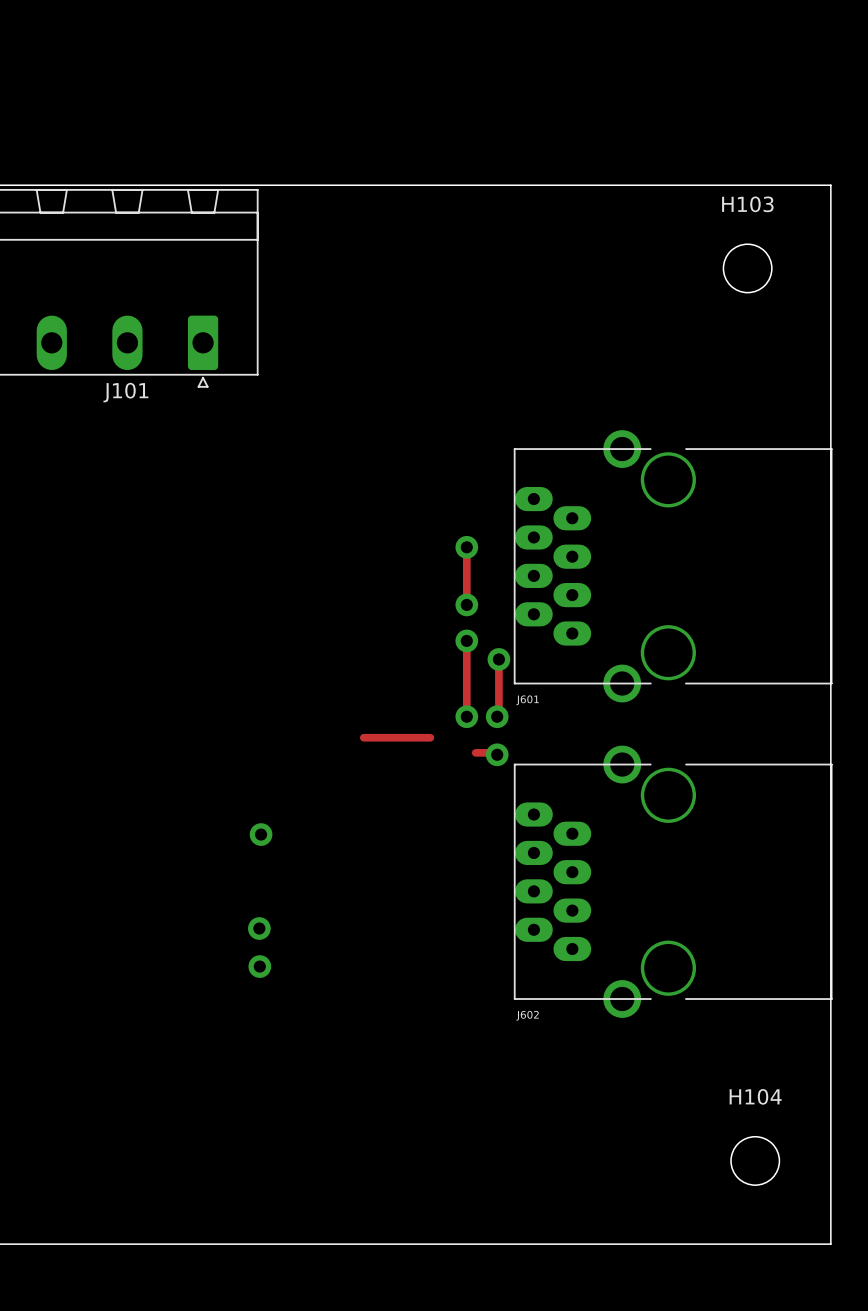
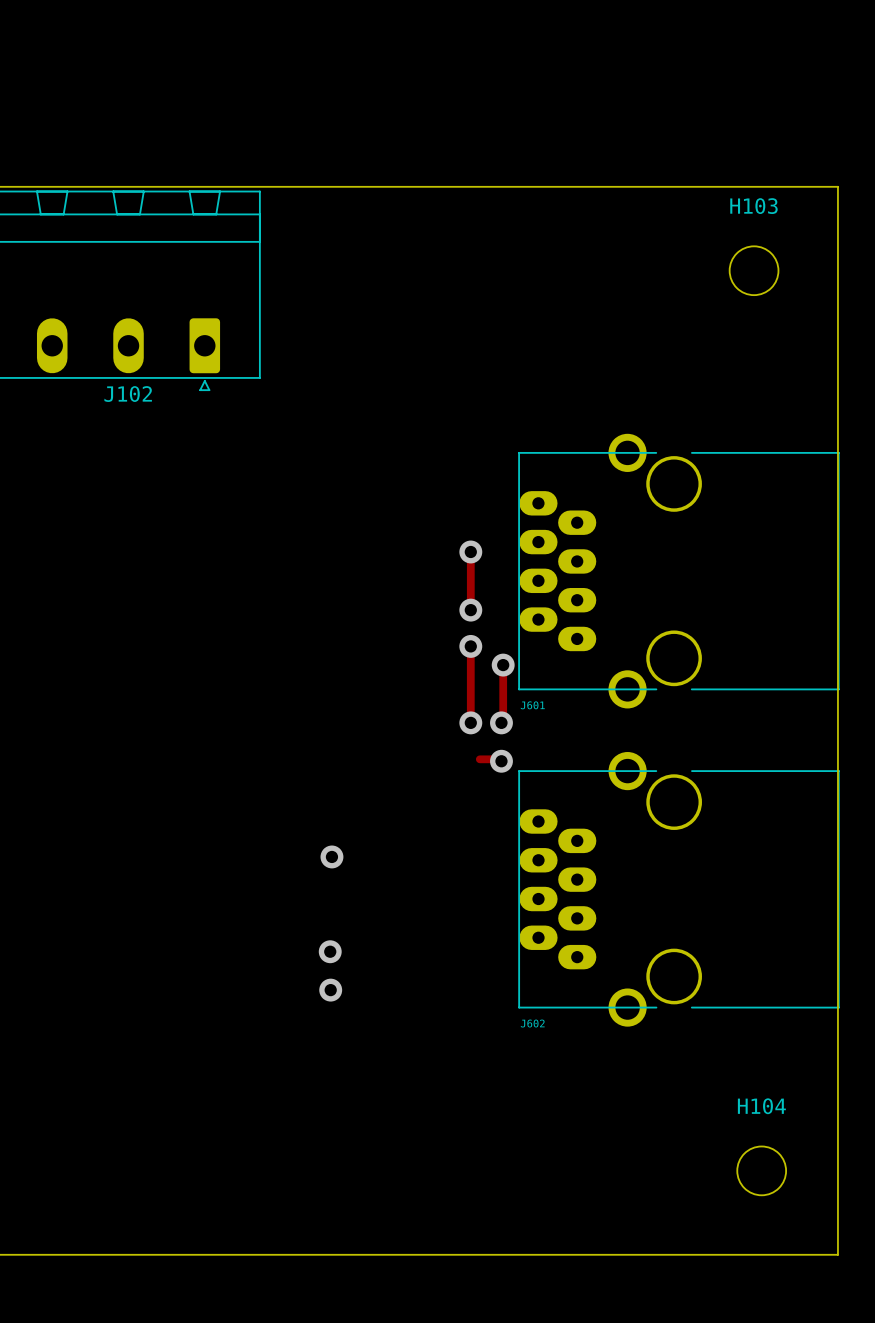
J101 name: J101 (125, 392) -> J102 (128, 394)
track: (363, 737) (430, 737) -> none
via: (261, 834) -> none
via: none -> (331, 856)
via: (259, 928) -> none
via: none -> (330, 951)
via: (259, 966) -> none
via: none -> (330, 990)

